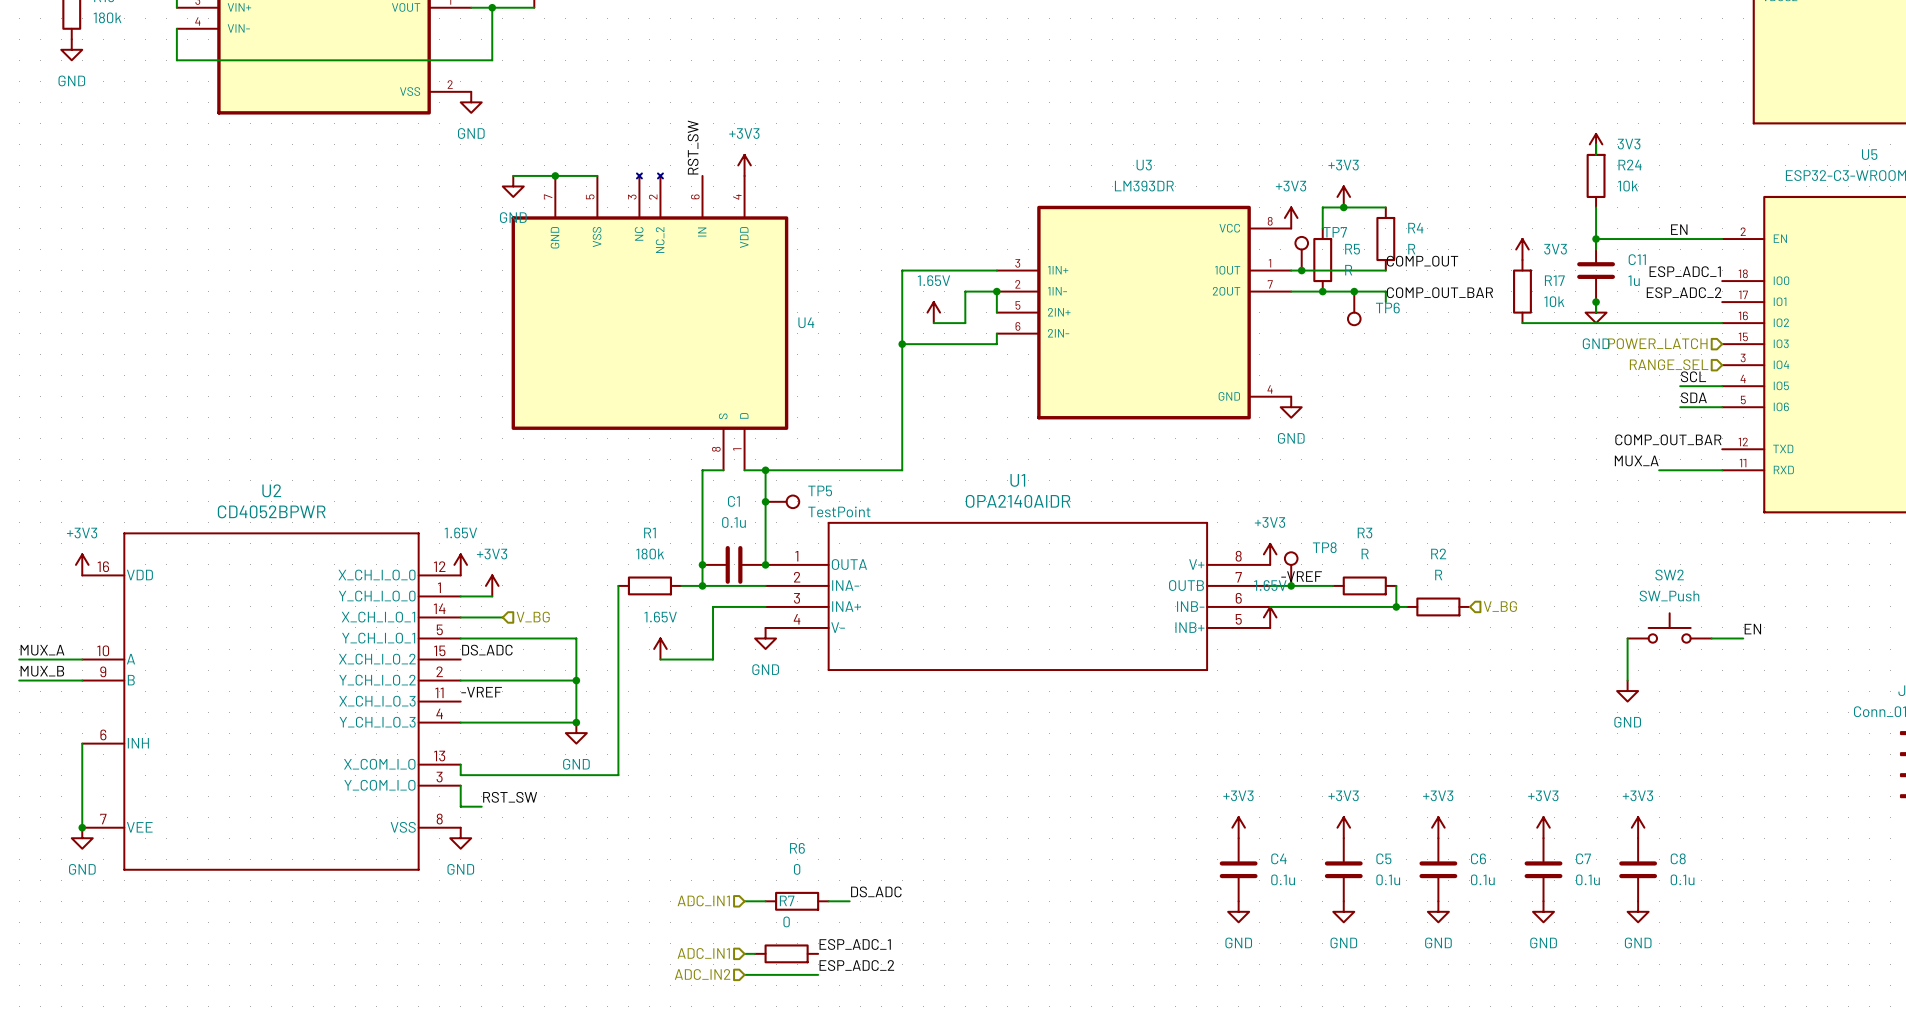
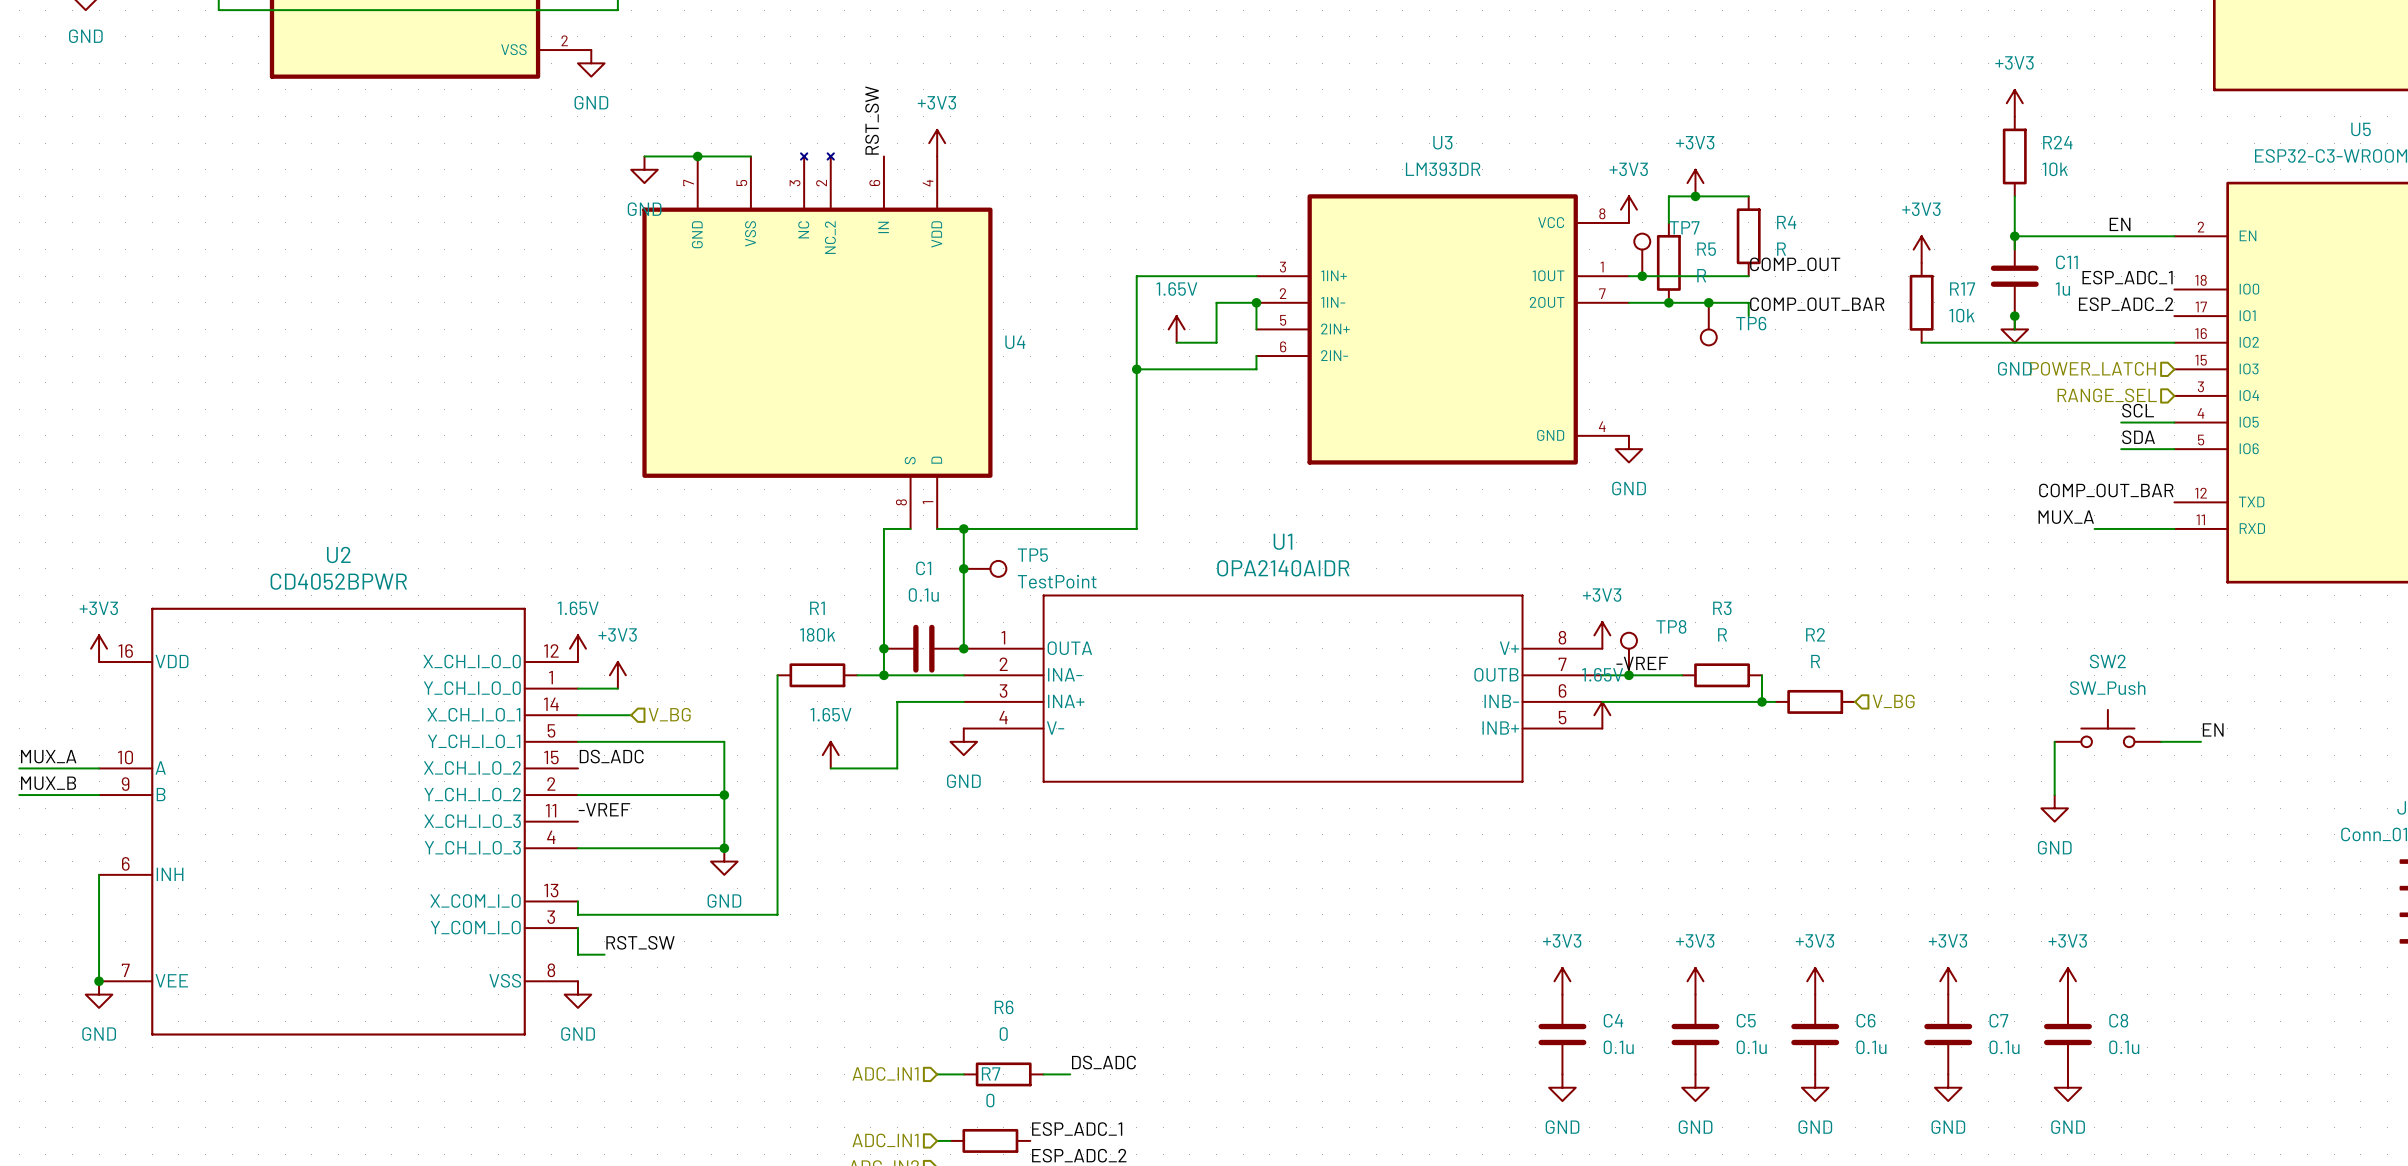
power symbol: none -> +3V3 (2014, 103)
power symbol: 3V3 (1596, 144) -> none
power symbol: 3V3 (1522, 249) -> +3V3 (1921, 249)

